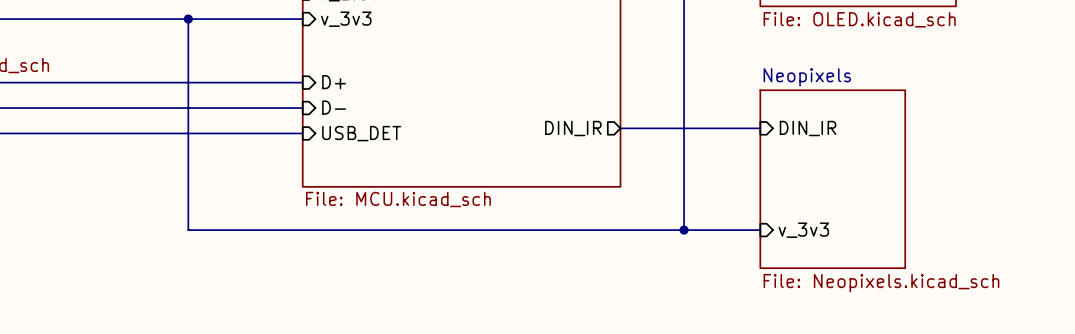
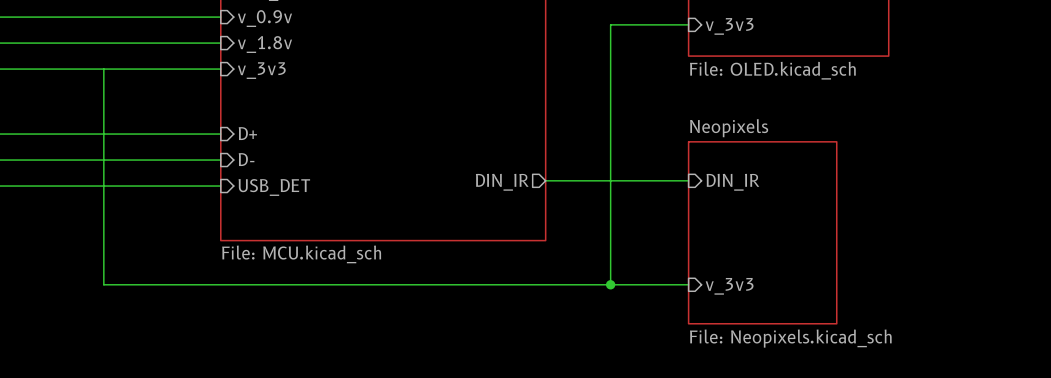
junction: (188, 19) -> none

